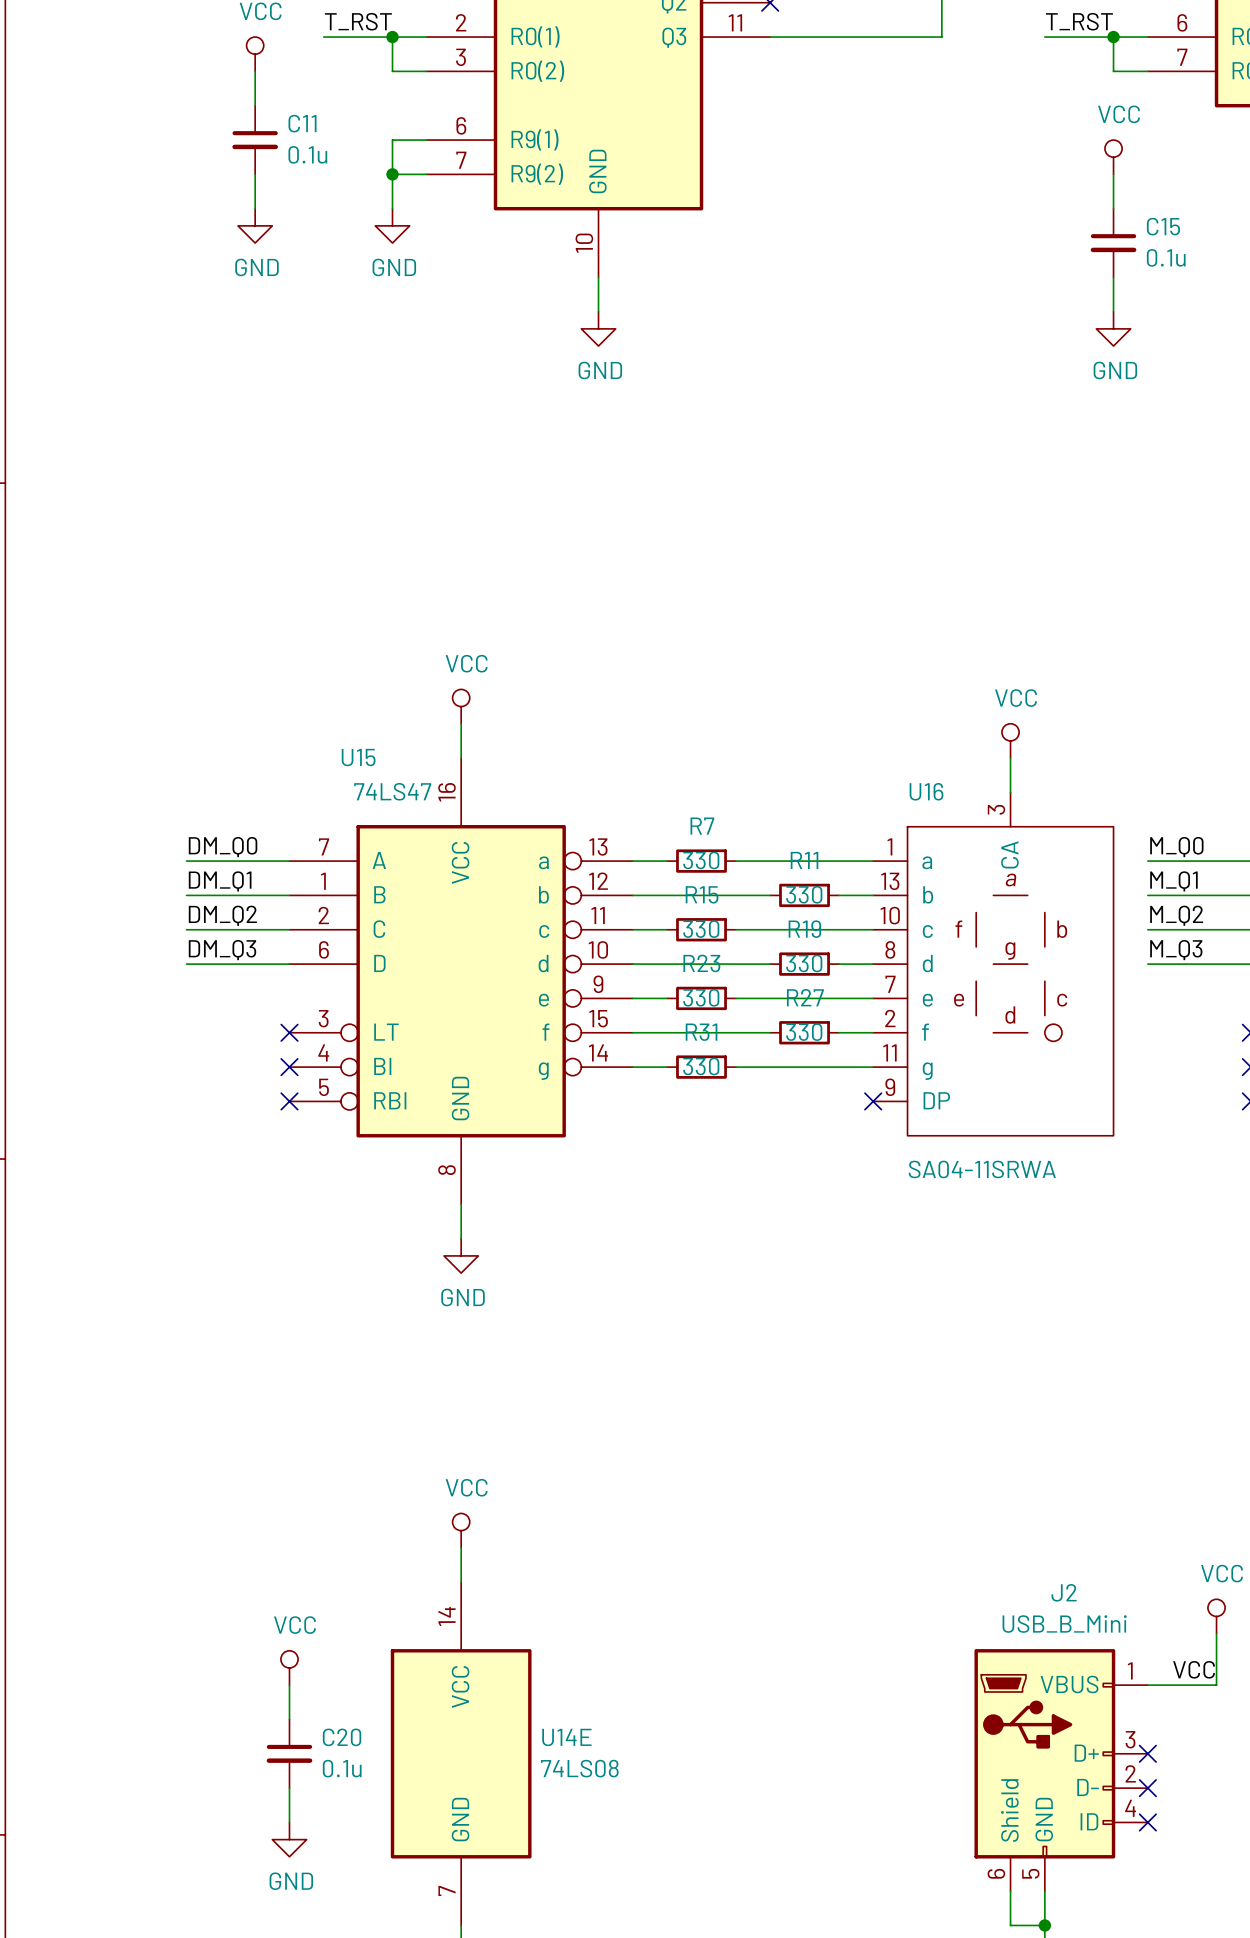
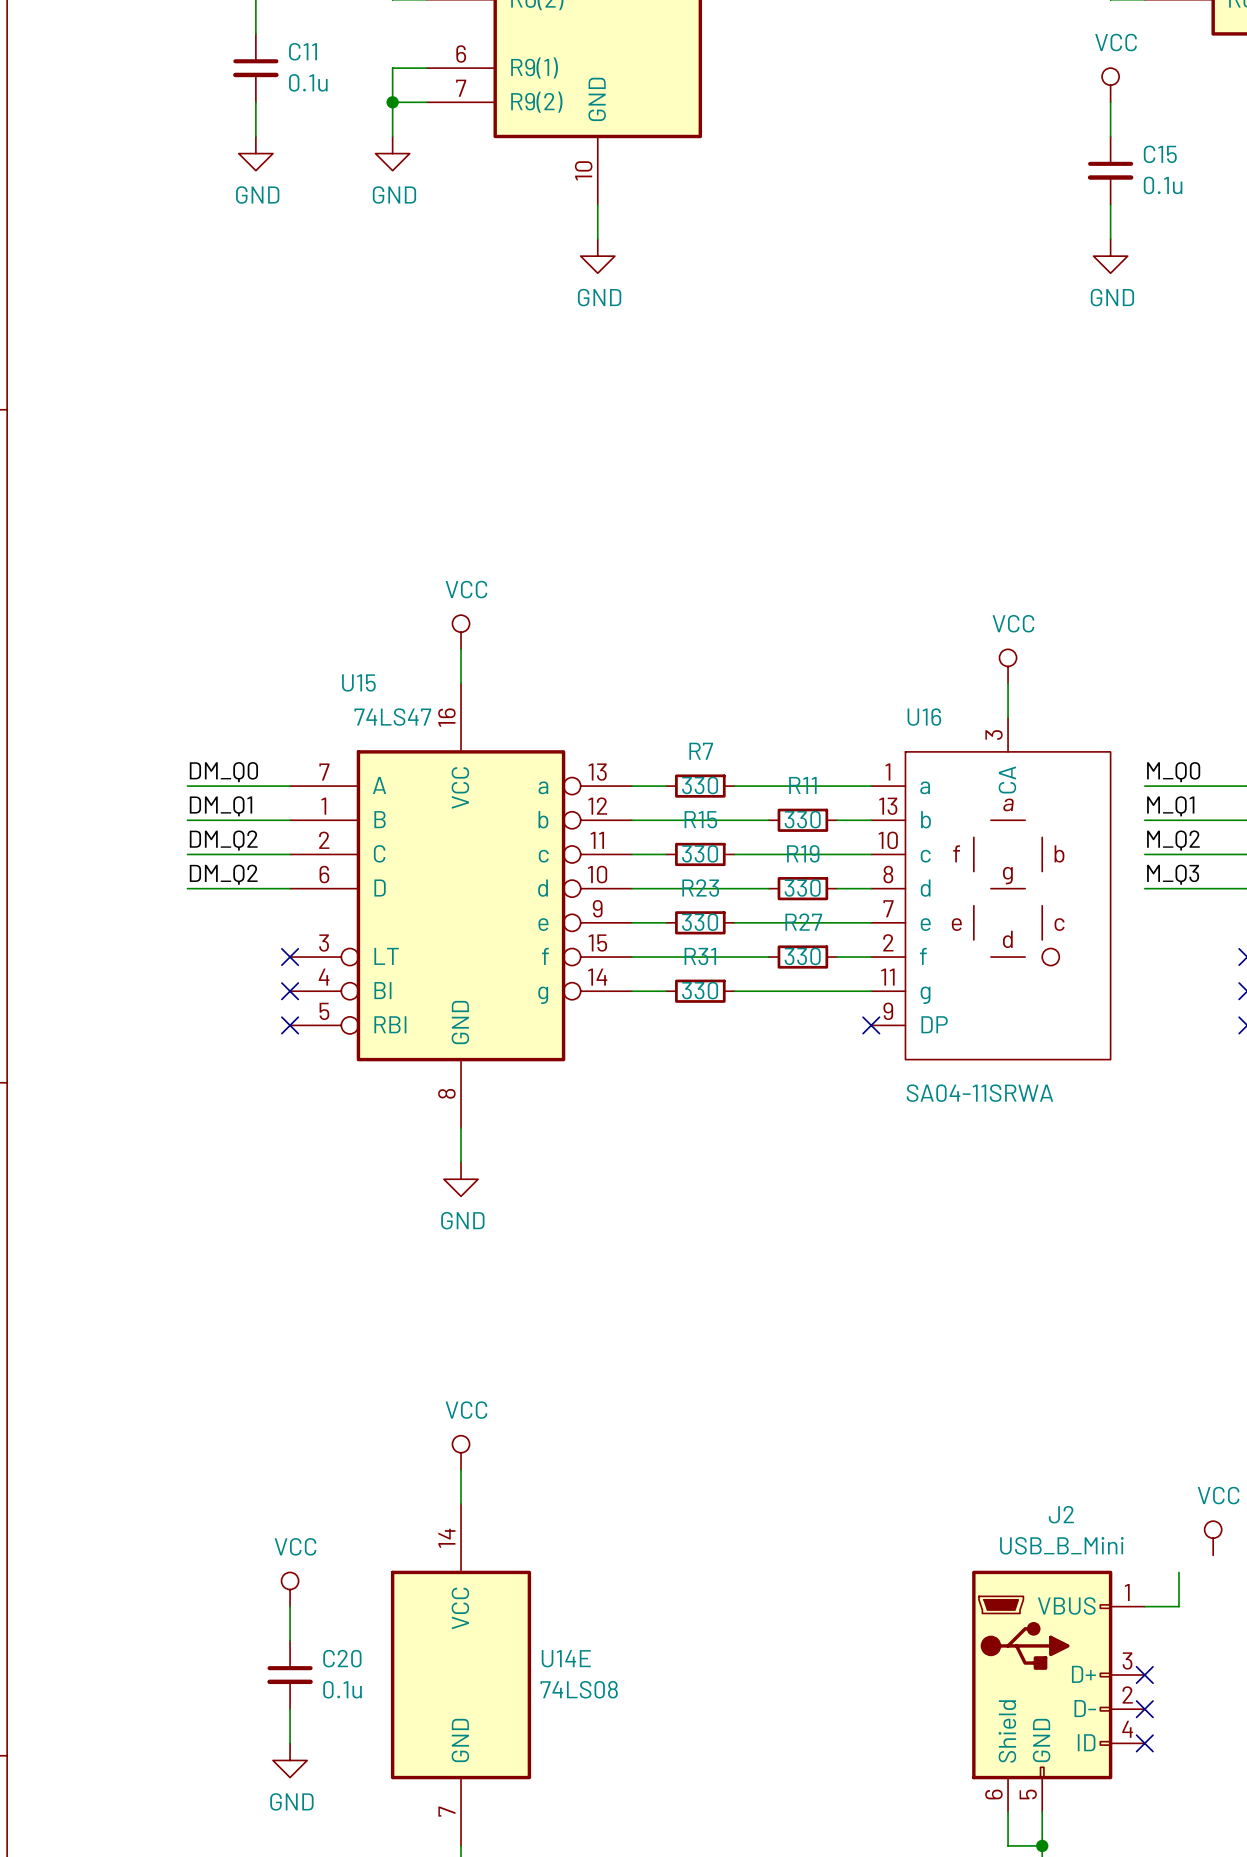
label: DM_Q3 (222, 950) -> DM_Q2 (223, 874)
wire: (1216, 1633) (1216, 1685) (1182, 1685) -> (1178, 1572) (1178, 1606)
label: VCC (1194, 1669) -> none

